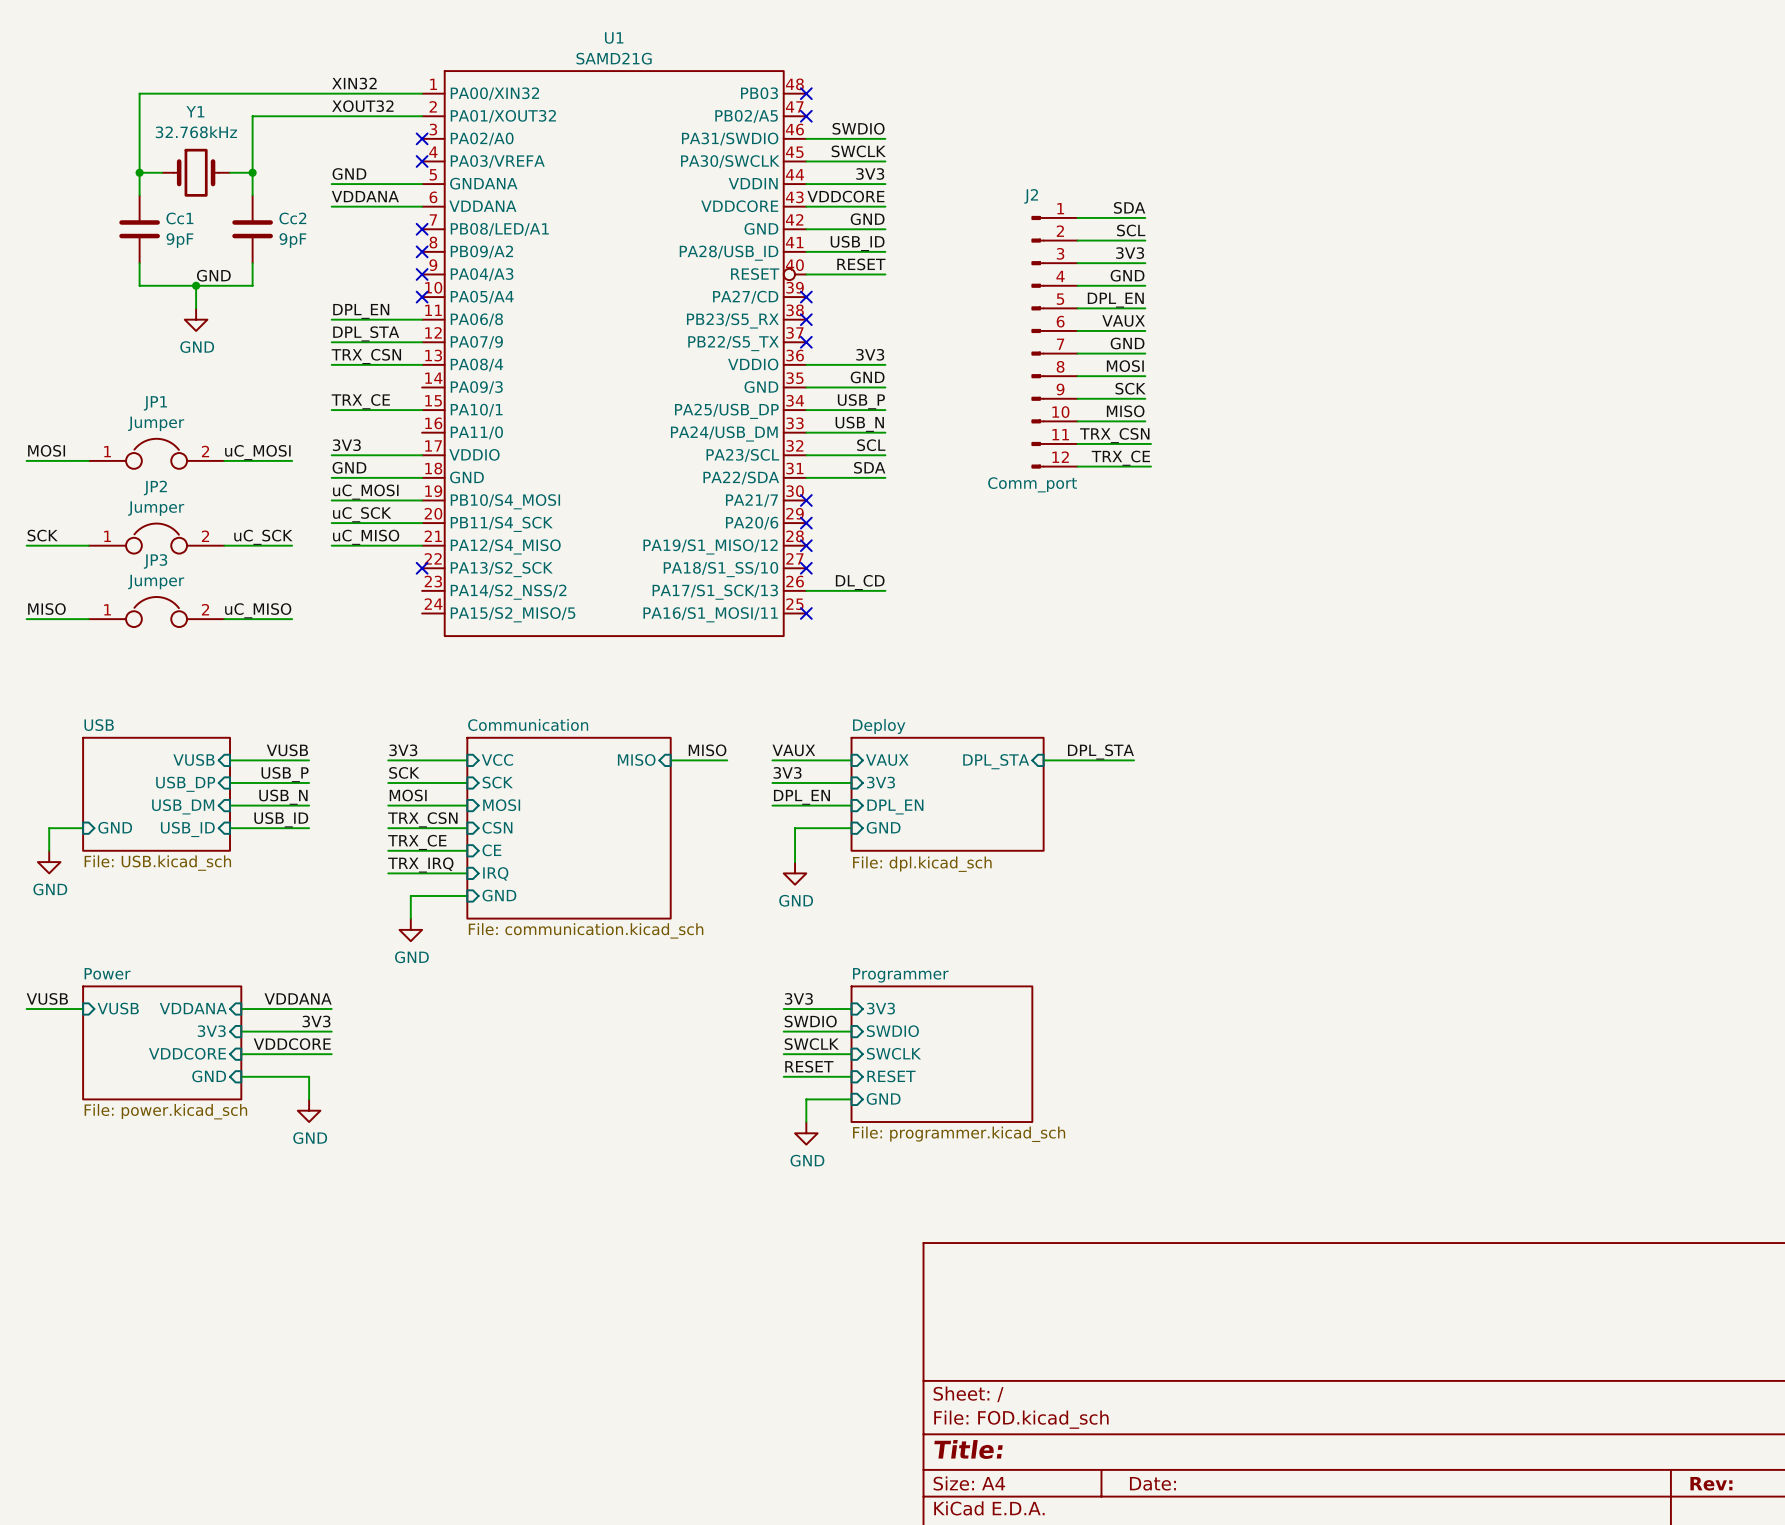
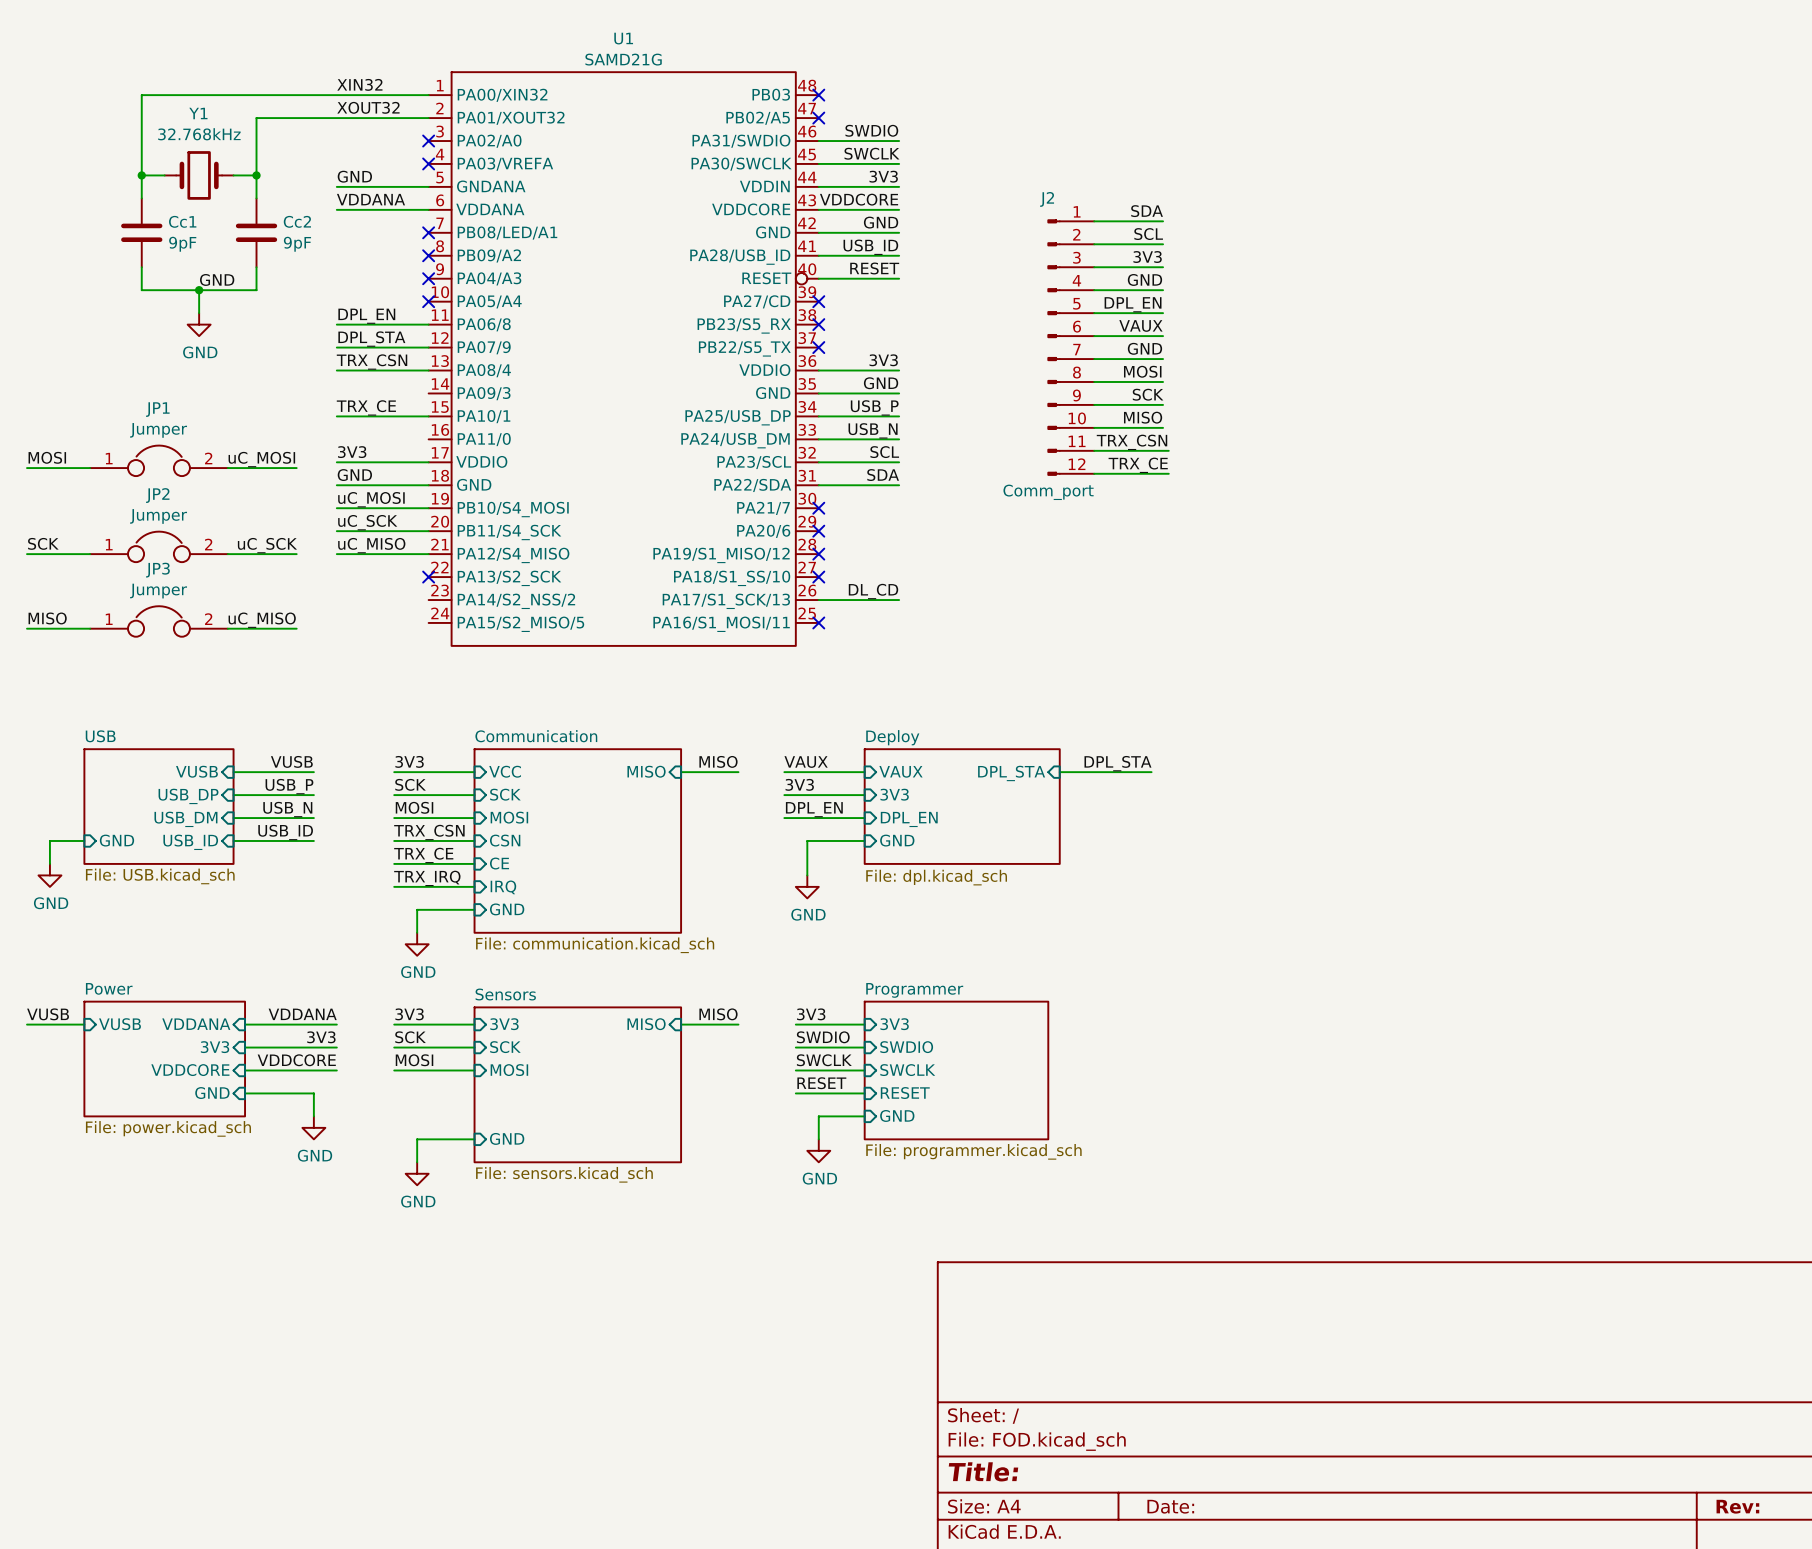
label: none -> 3V3 (409, 1014)
label: none -> MISO (718, 1014)
sheet pin: none -> 3V3 (504, 1024)
sheet pin: none -> MISO (646, 1024)
wire: none -> (394, 1024) (474, 1024)
wire: none -> (681, 1024) (738, 1024)
label: none -> SCK (410, 1037)
wire: none -> (394, 1047) (474, 1047)
sheet pin: none -> SCK (505, 1047)
label: none -> MOSI (414, 1060)
sheet pin: none -> MOSI (509, 1070)
wire: none -> (394, 1070) (474, 1070)
sheet Sensors: none -> File: sensors.kicad_sch (577, 1084)
sheet pin: none -> GND (507, 1138)
wire: none -> (474, 1139) (417, 1139) (417, 1162)
power symbol: none -> GND (417, 1173)

